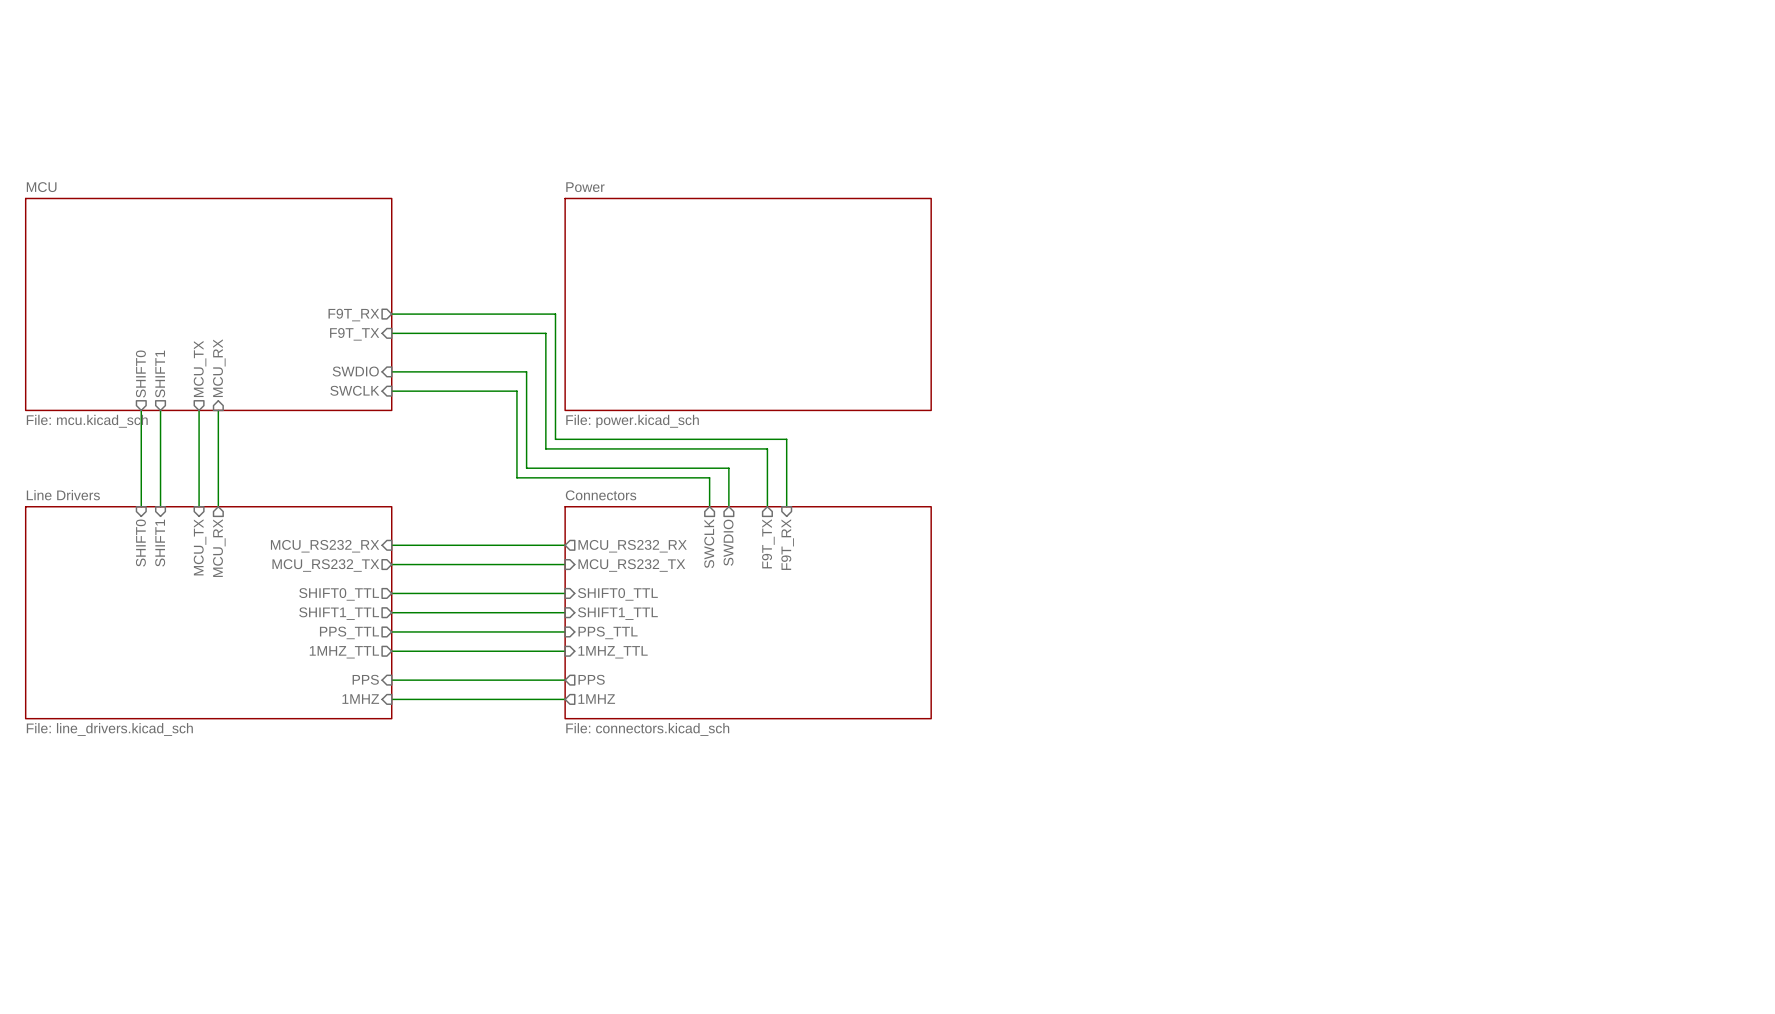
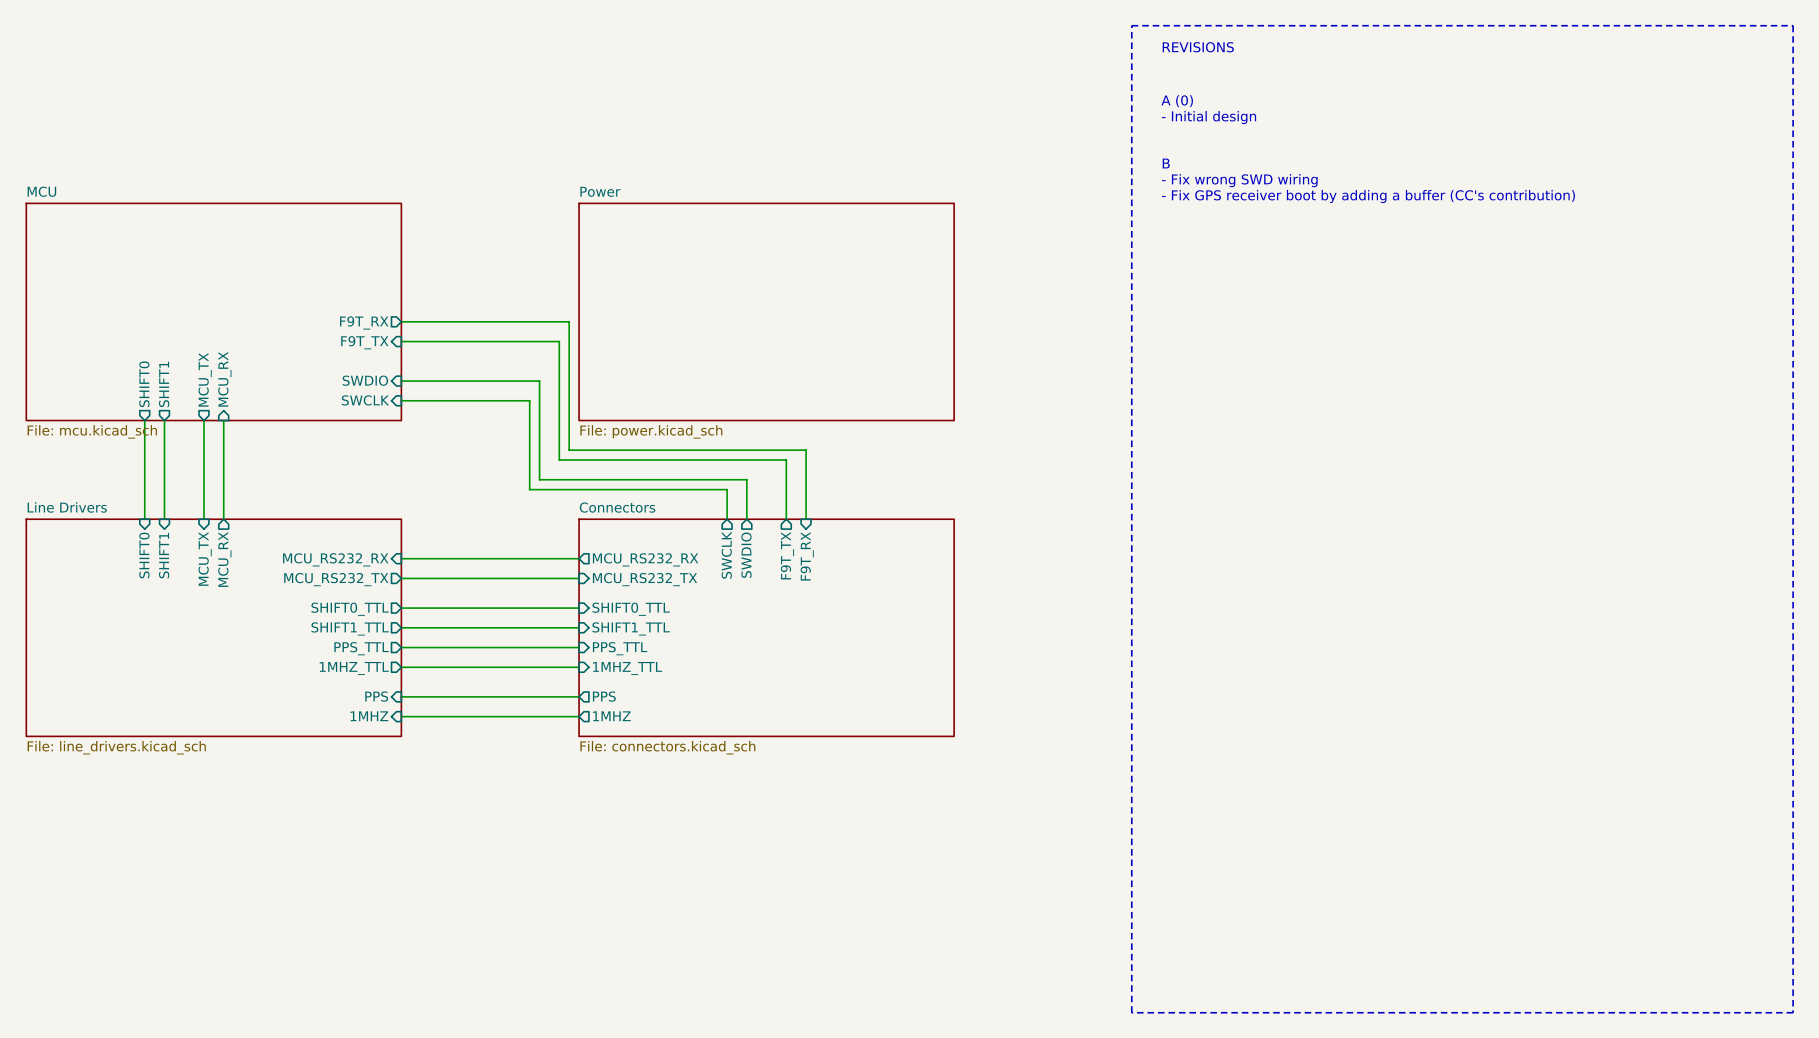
line: none -> (1131, 25) (1793, 25) (1793, 1012) (1131, 1012) (1131, 25)
text: none -> REVISIONS (1198, 47)
text: none -> A (0) (1177, 101)
text: none -> - Initial design (1209, 117)
text: none -> B (1166, 163)
text: none -> - Fix wrong SWD wiring (1239, 180)
text: none -> - Fix GPS receiver boot by adding a buffer (CC's contribution) (1368, 196)

